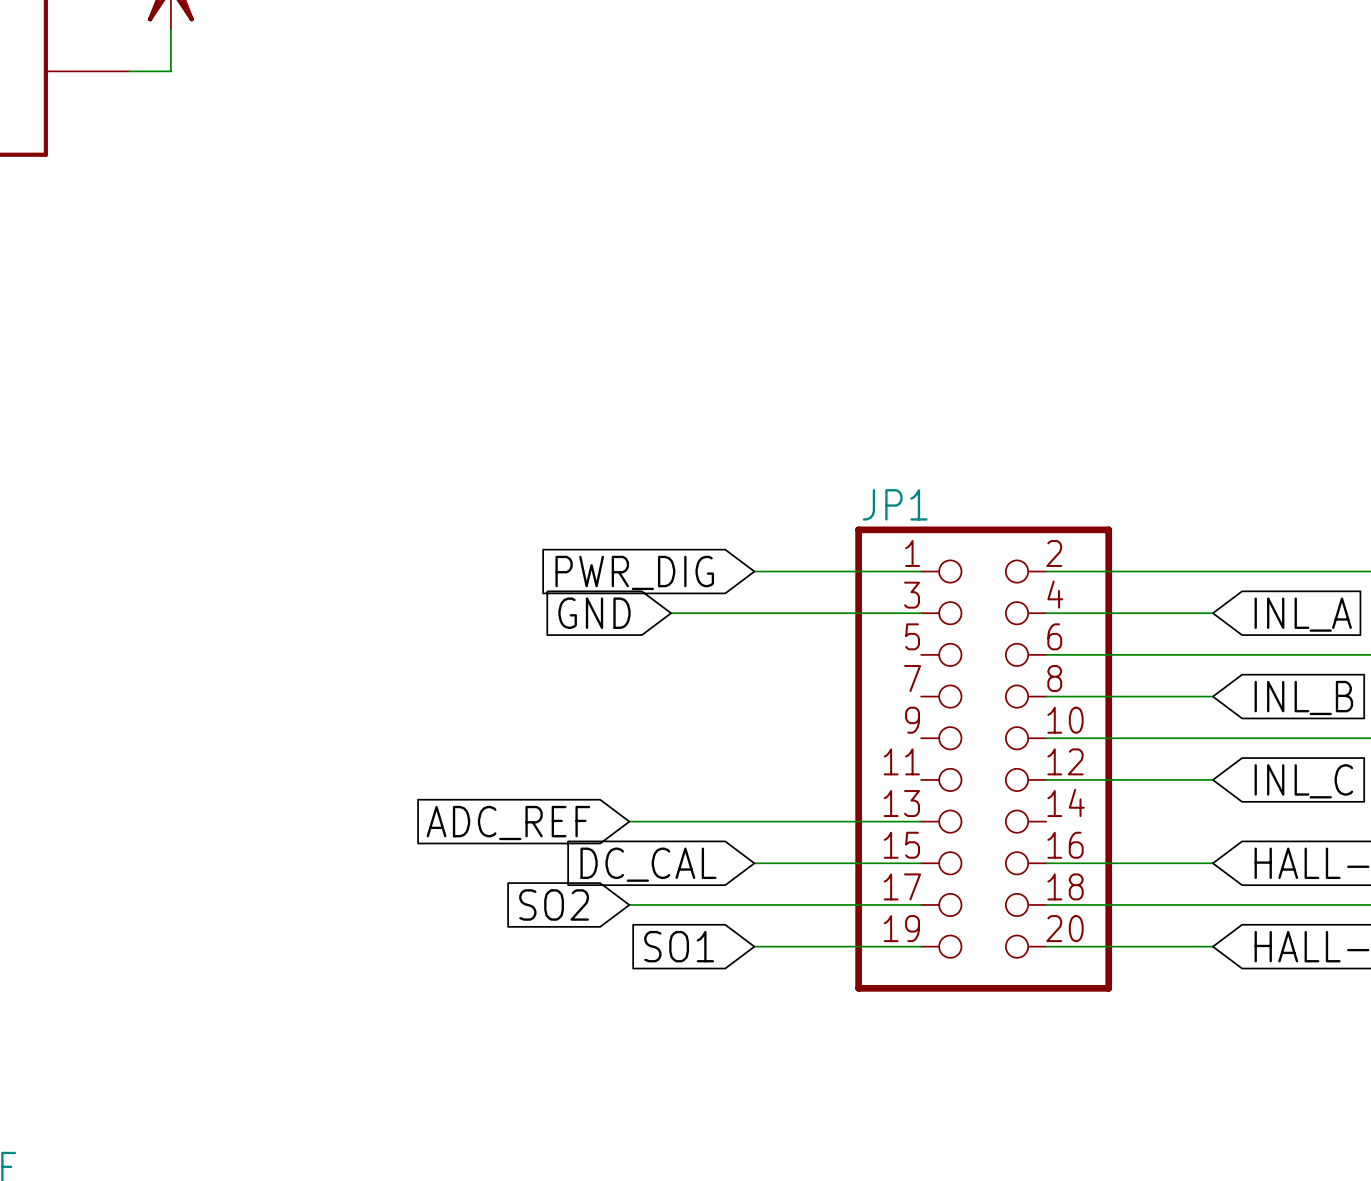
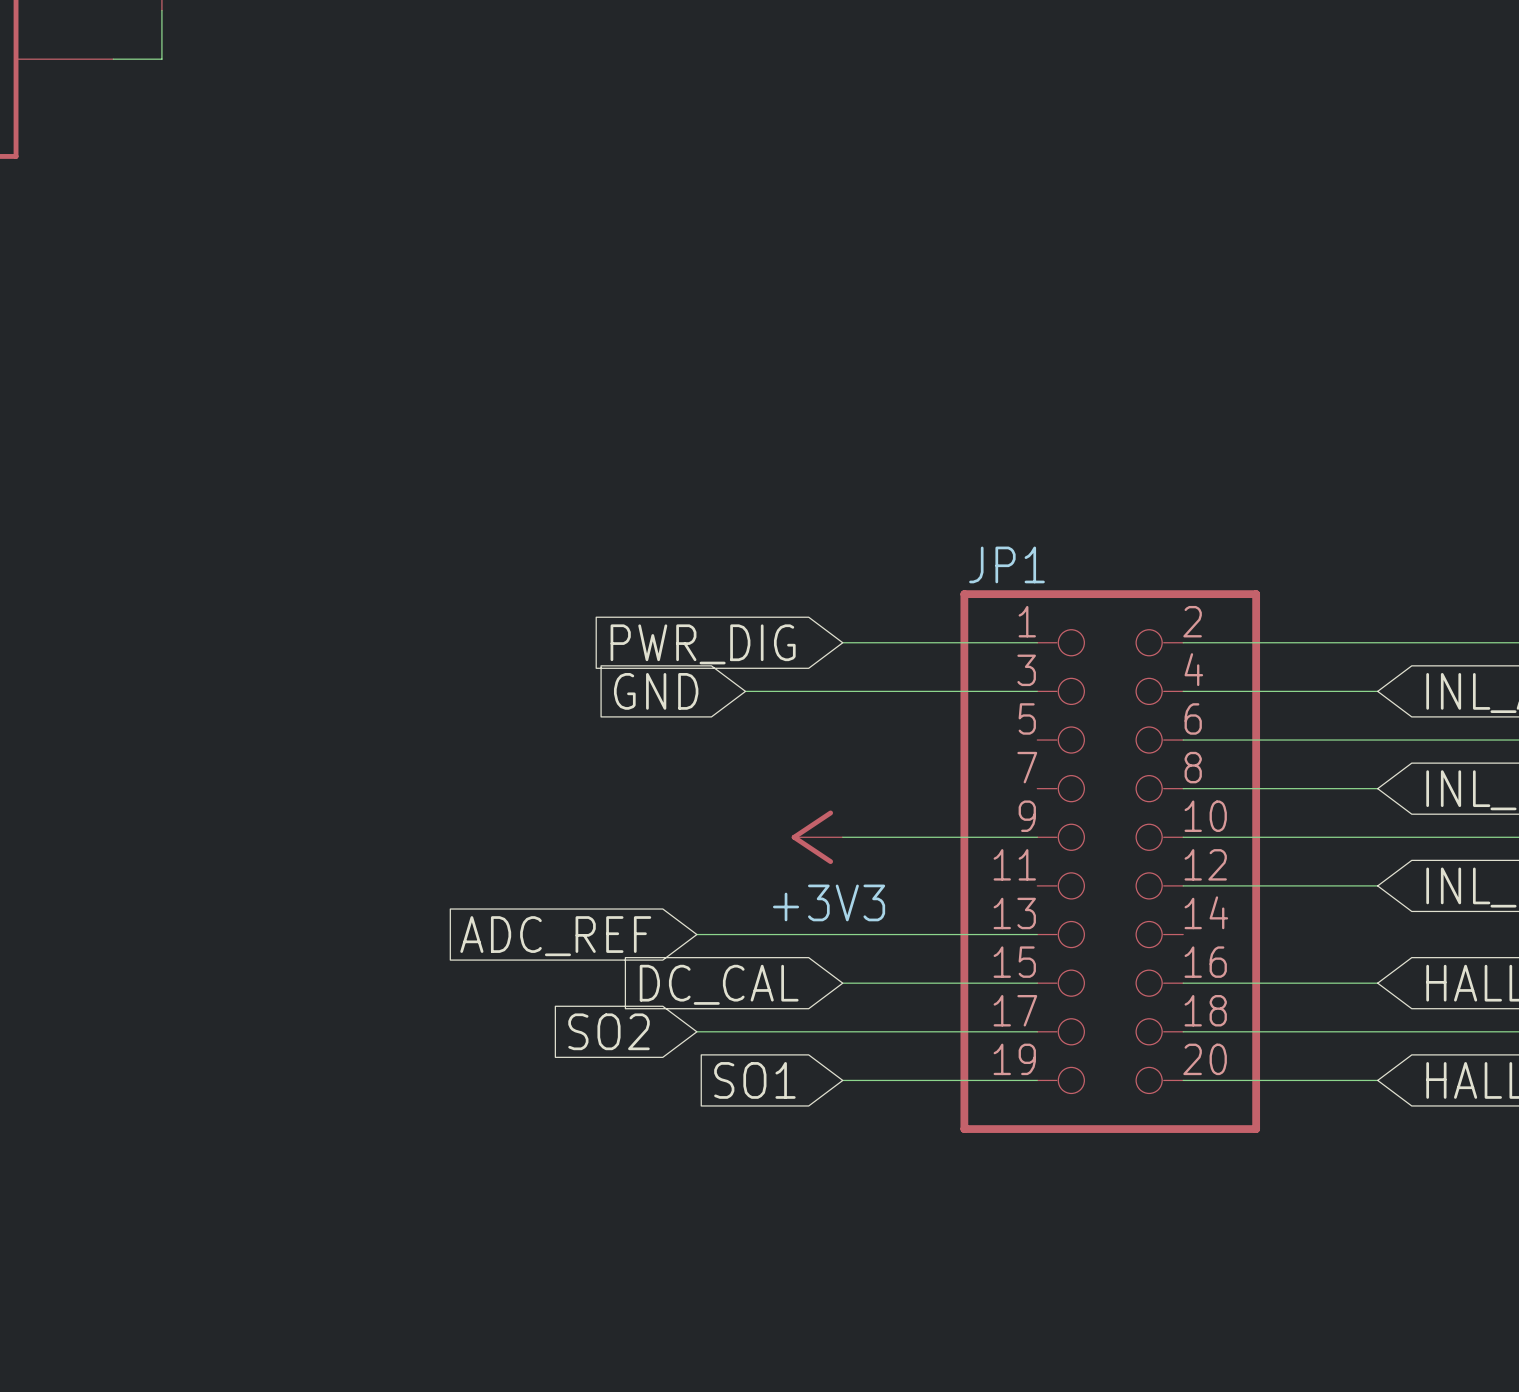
power symbol: none -> +3V3 (817, 837)
wire: none -> (842, 837) (1037, 837)

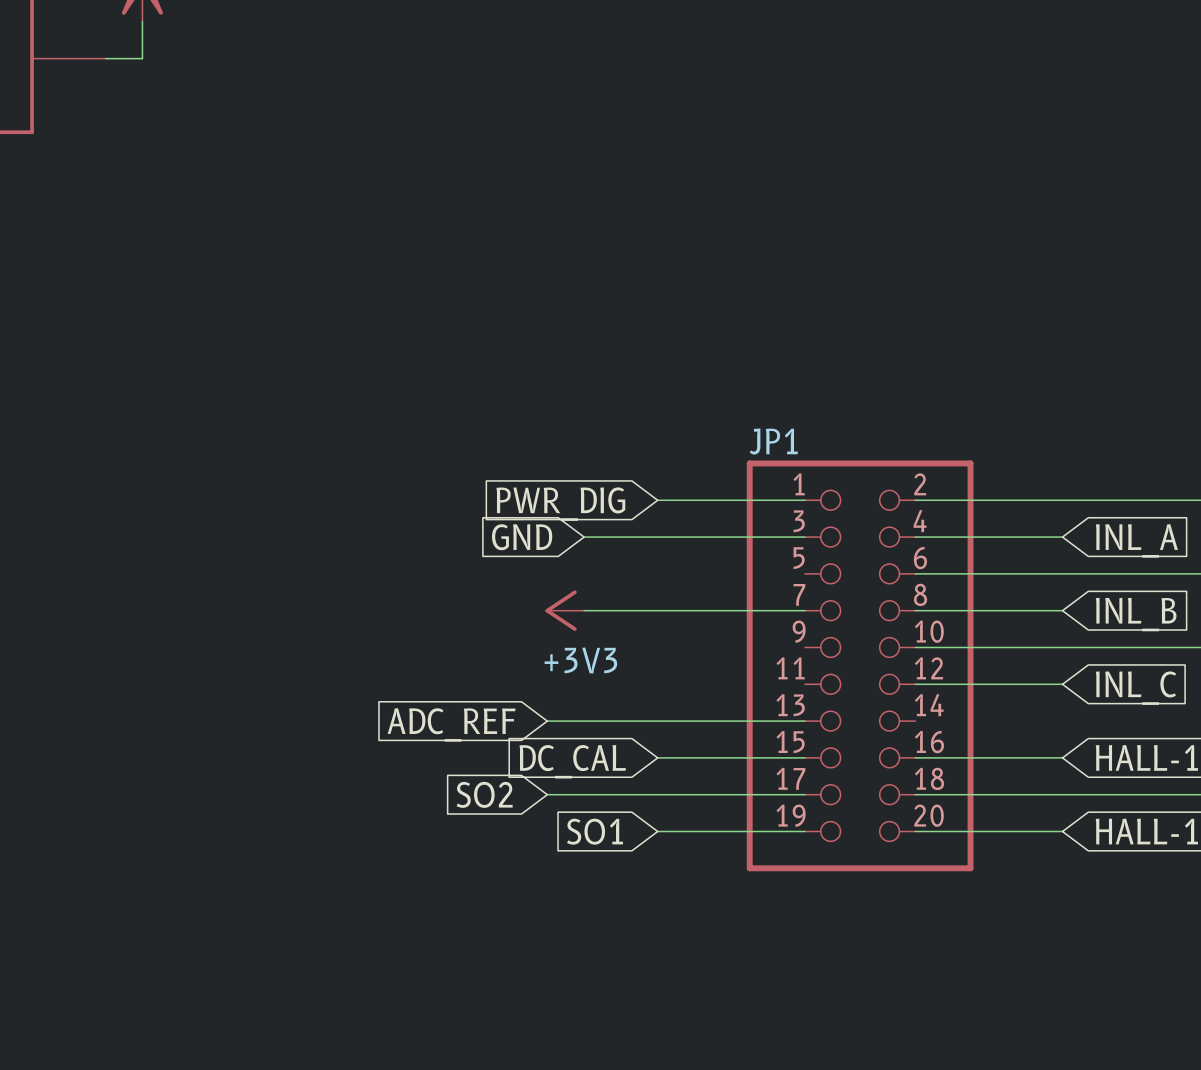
wire: none -> (584, 610) (804, 610)
power symbol position: +3V3 (817, 837) -> +3V3 (564, 610)
wire: (842, 837) (1037, 837) -> none

